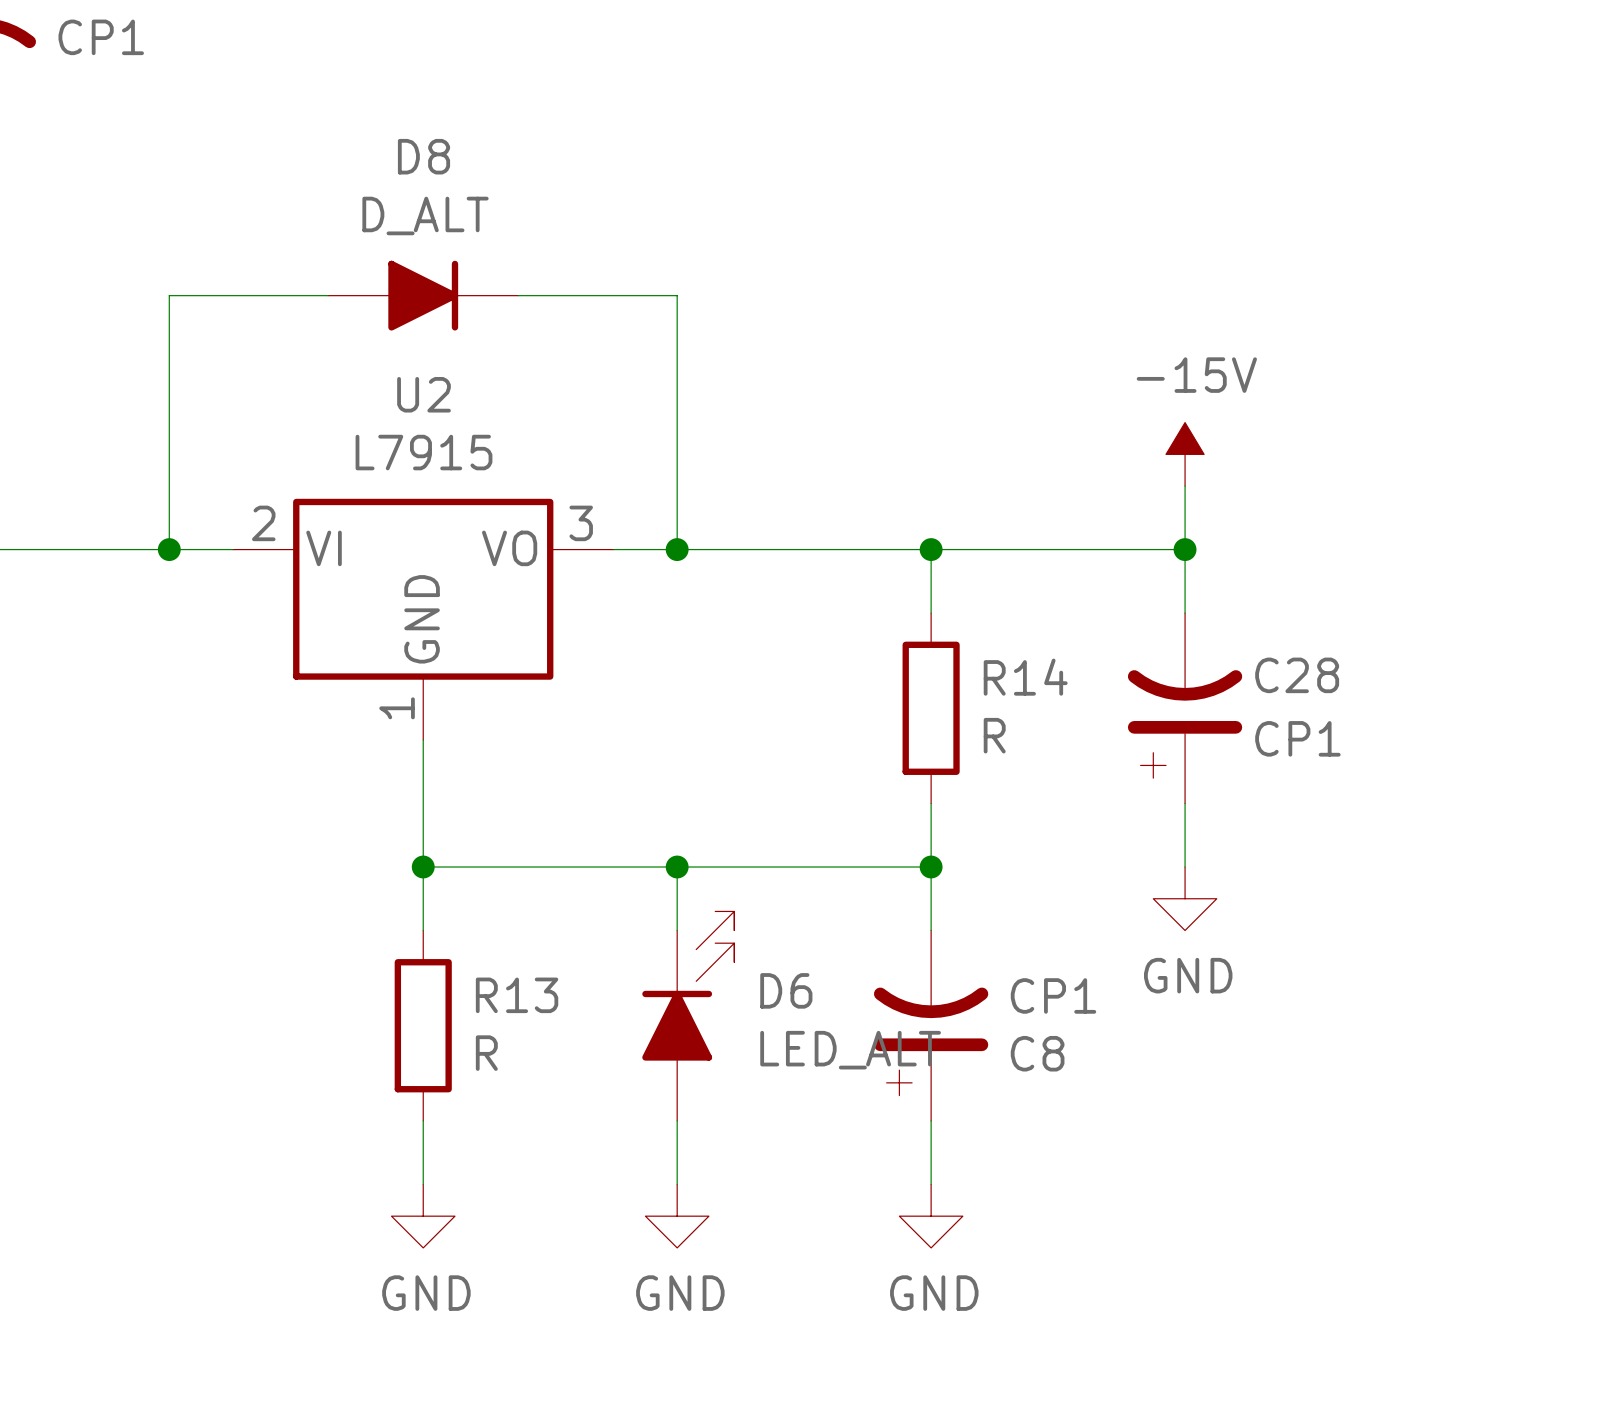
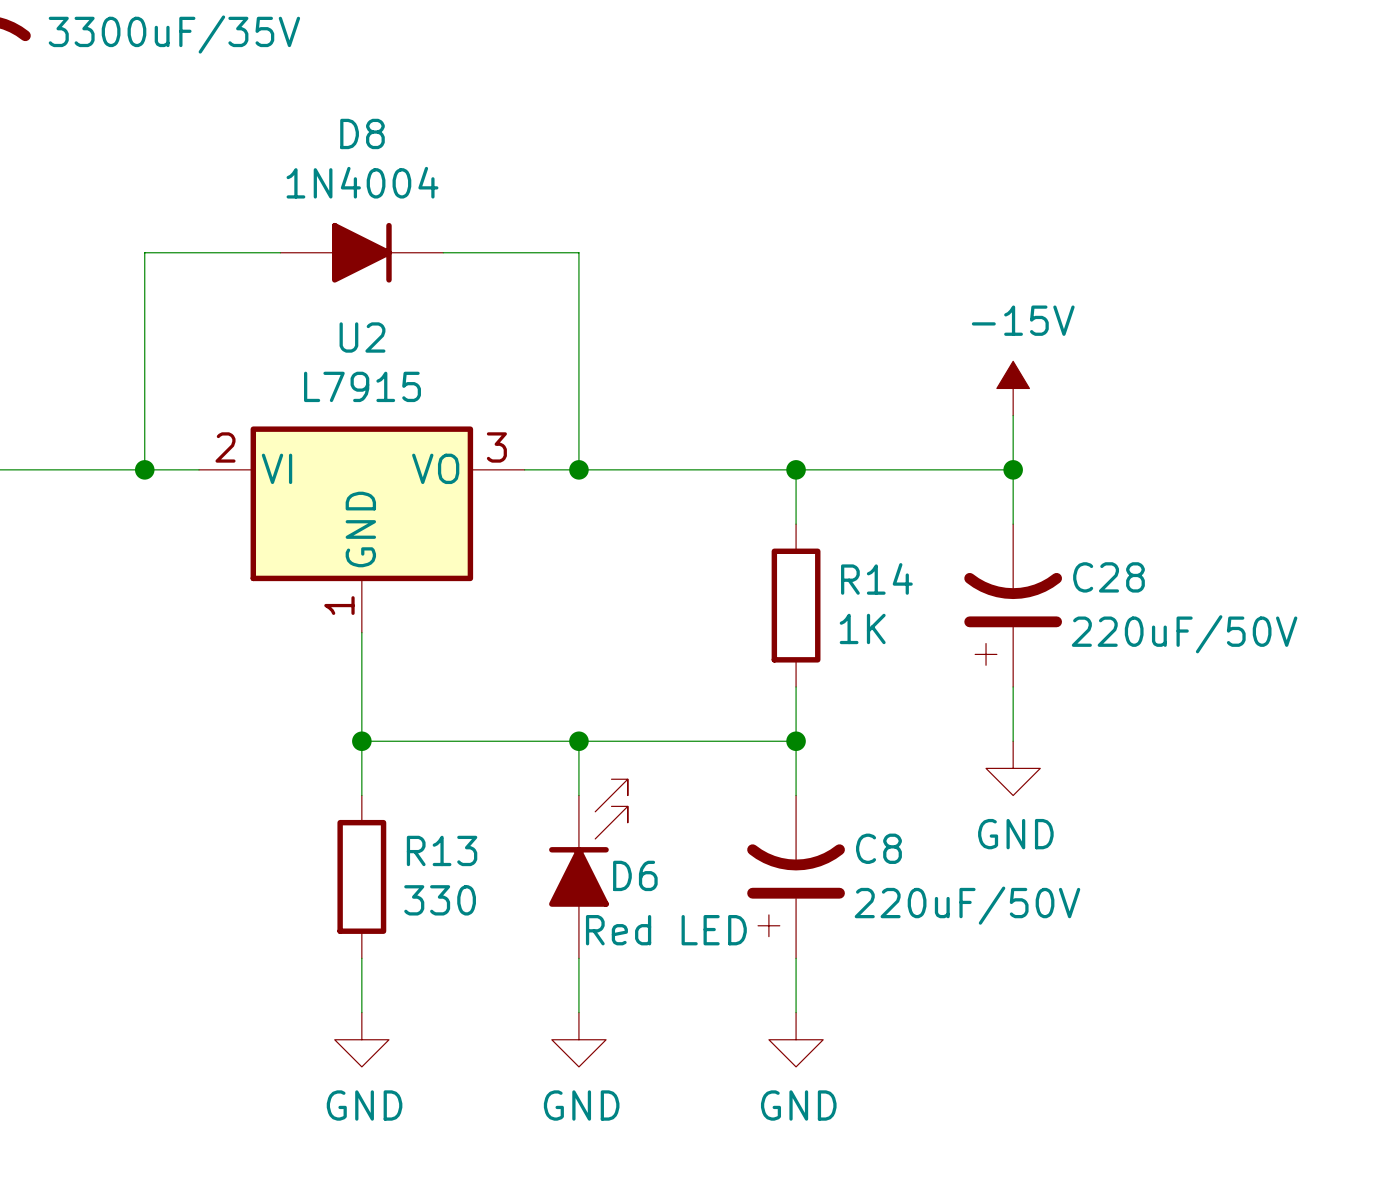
part value: CP1 (101, 37) -> 3300uF/35V (174, 34)
D8 value: D_ALT (425, 215) -> 1N4004 (362, 182)
R14 value: R (994, 735) -> 1K (862, 628)
C28 value: CP1 (1297, 738) -> 220uF/50V (1184, 634)
D6 name position: D6 (786, 990) -> D6 (635, 875)
C8 value: CP1 (1053, 995) -> 220uF/50V (967, 905)
D6 value: LED_ALT (850, 1050) -> Red LED (666, 930)
R13 value: R (486, 1053) -> 330 (440, 900)
C8 name position: C8 (1037, 1053) -> C8 (878, 848)

